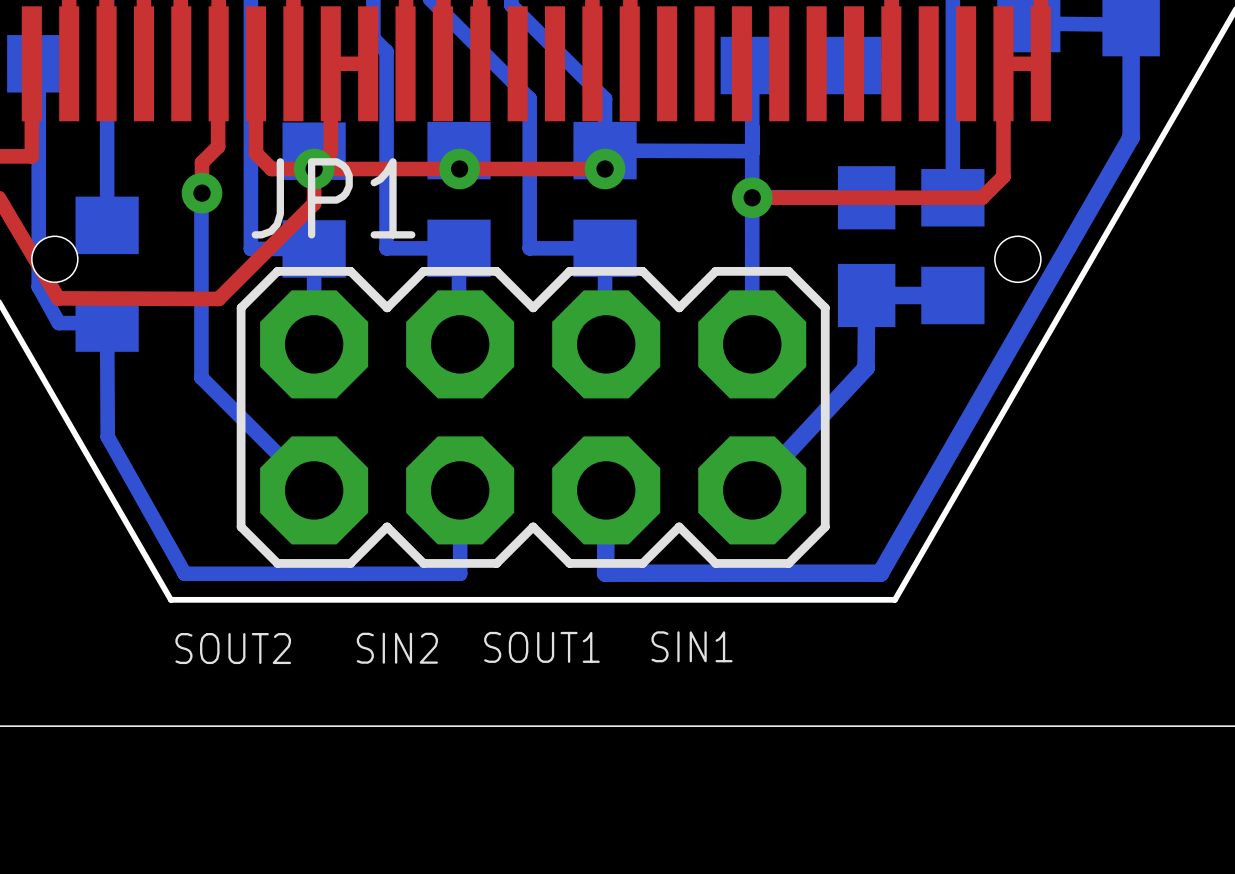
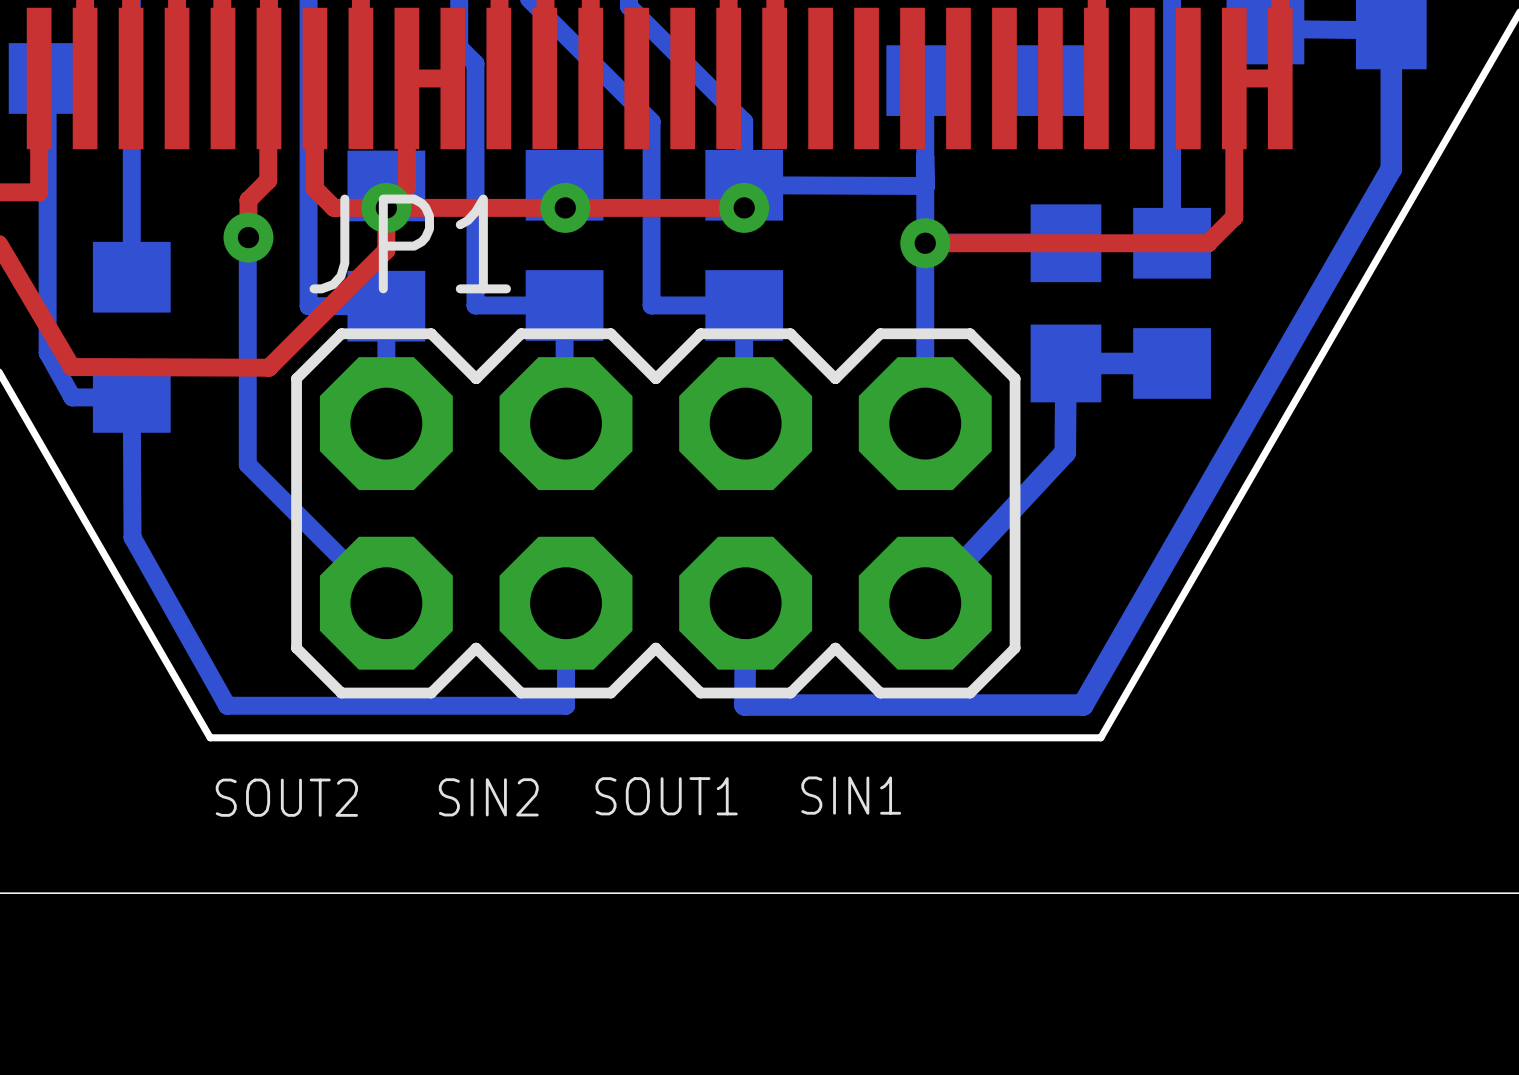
part: (536, 144) -> none

